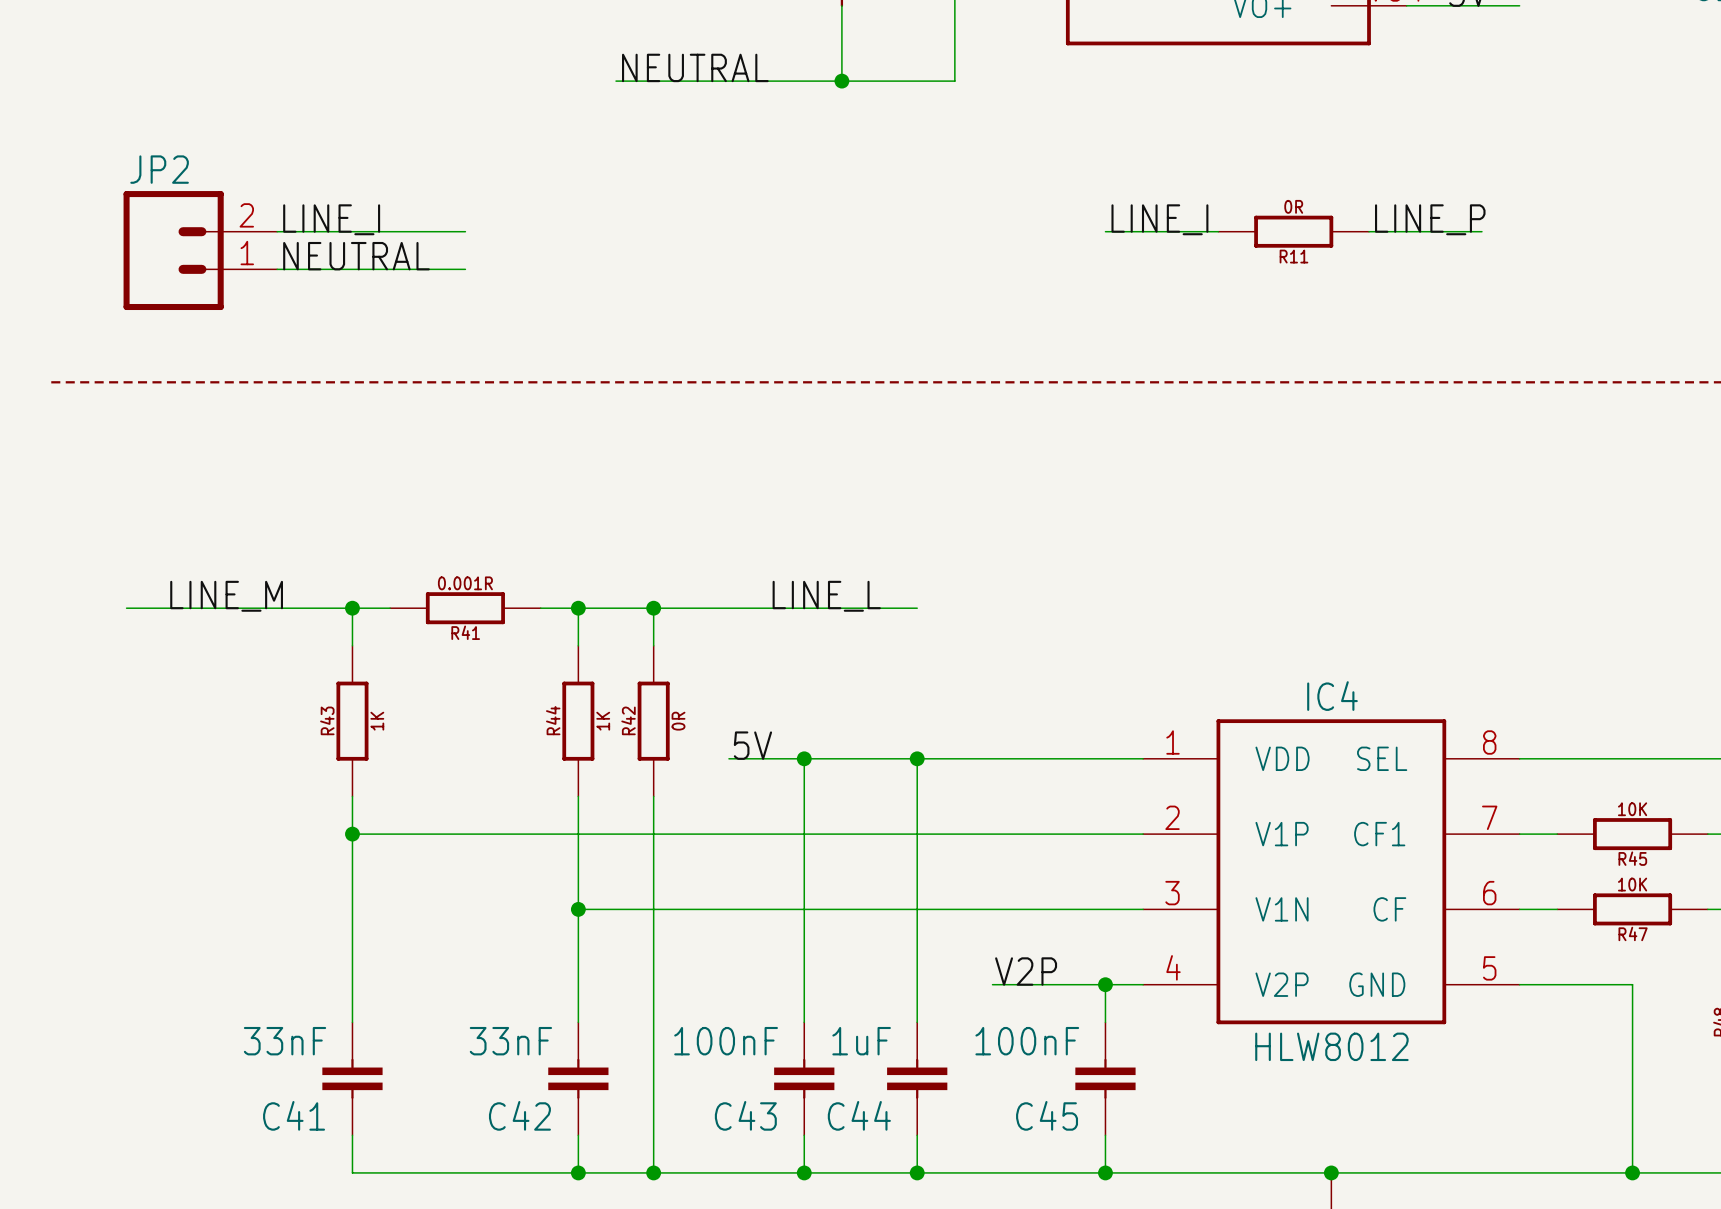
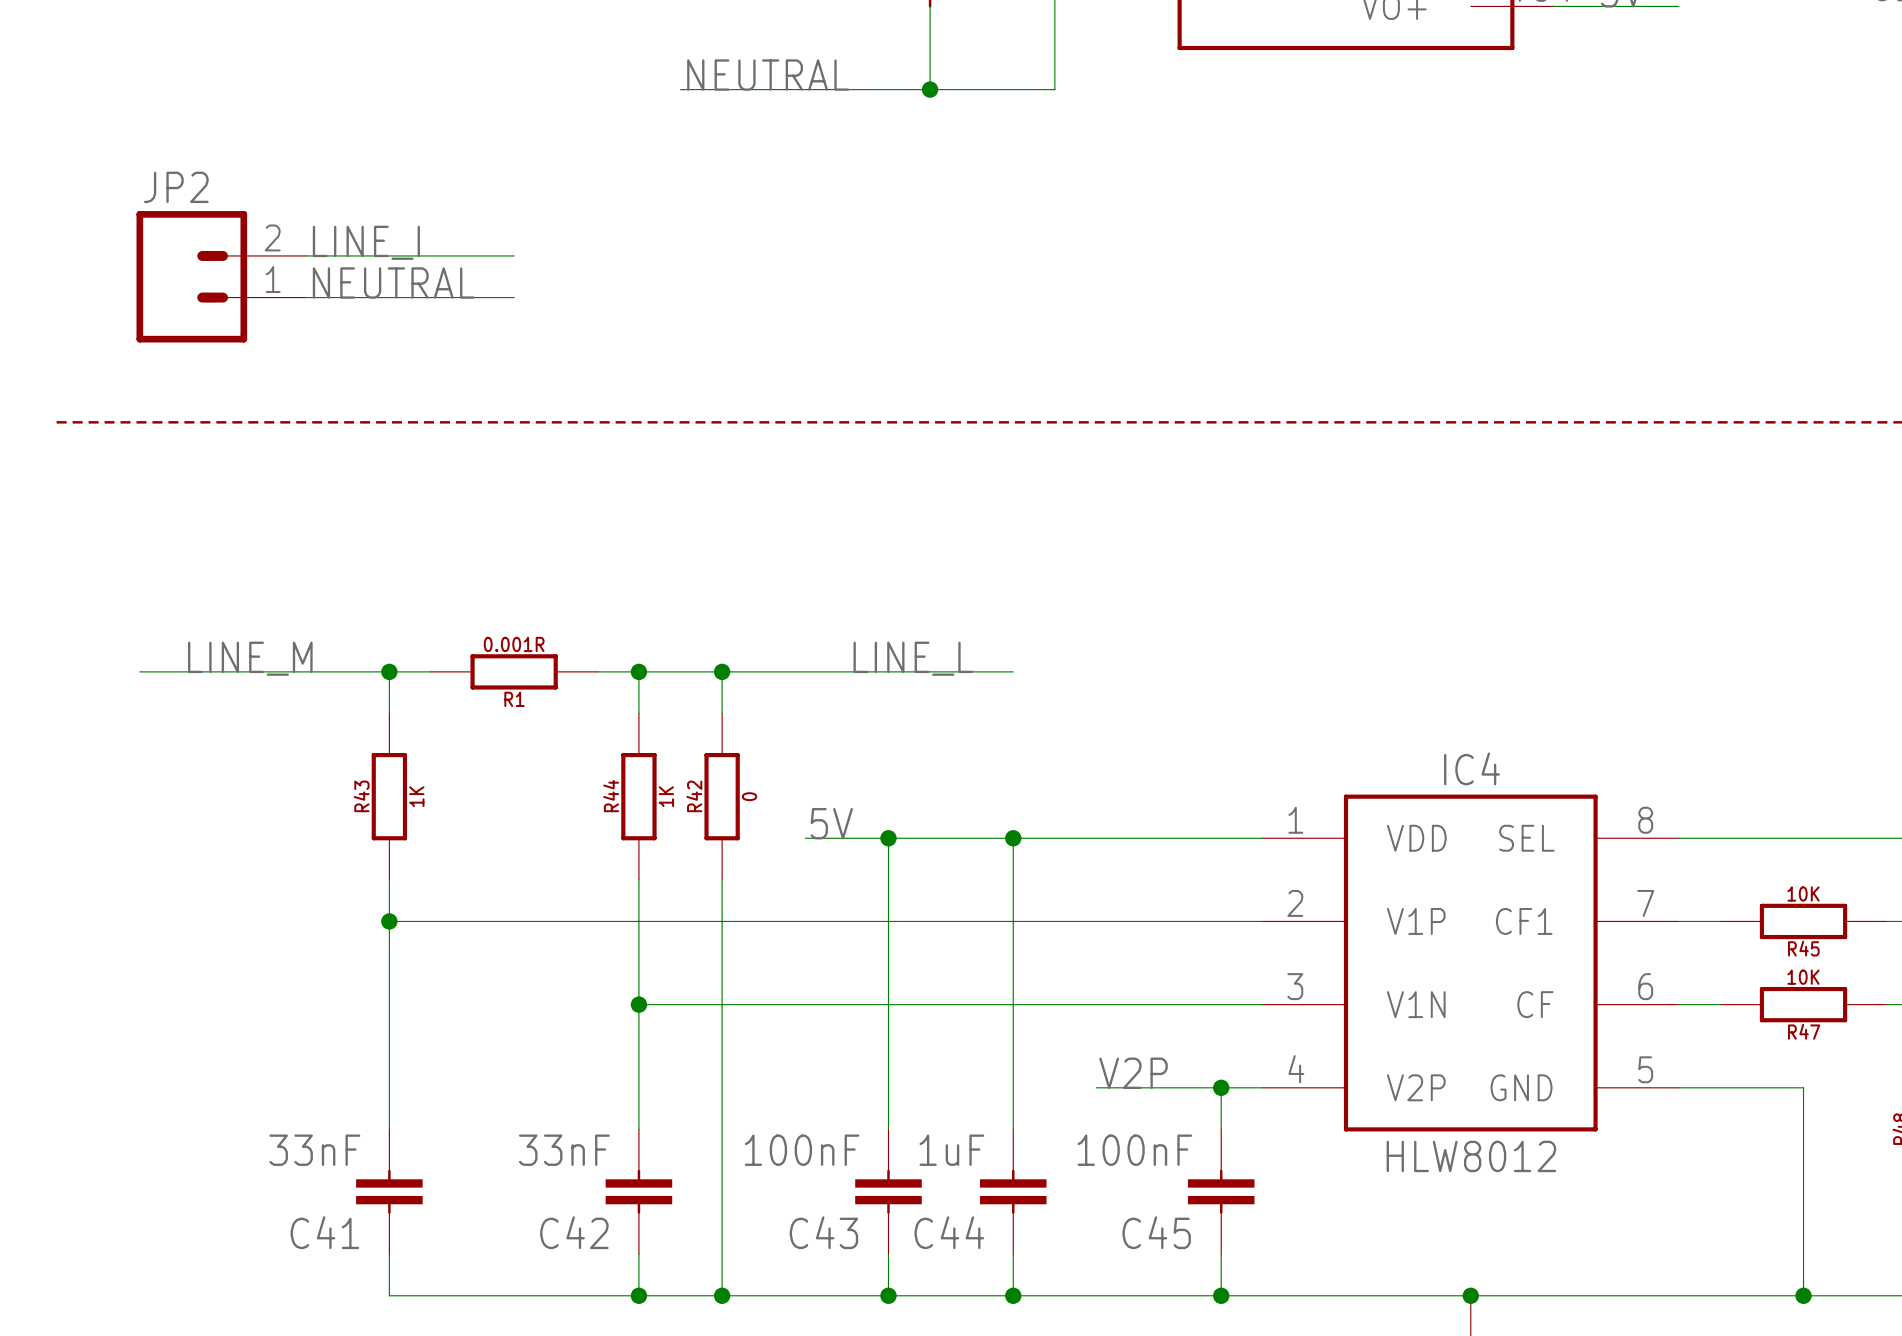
label: LINE_I (1159, 219) -> none
label: LINE_P (1430, 219) -> none
wire: (1105, 231) (1218, 231) -> none
R11: 0R (1293, 231) -> none
wire: (1369, 231) (1481, 231) -> none
R41 name: R41 (465, 632) -> R1 (514, 699)
R42 value: 0R (678, 721) -> 0 (749, 796)

